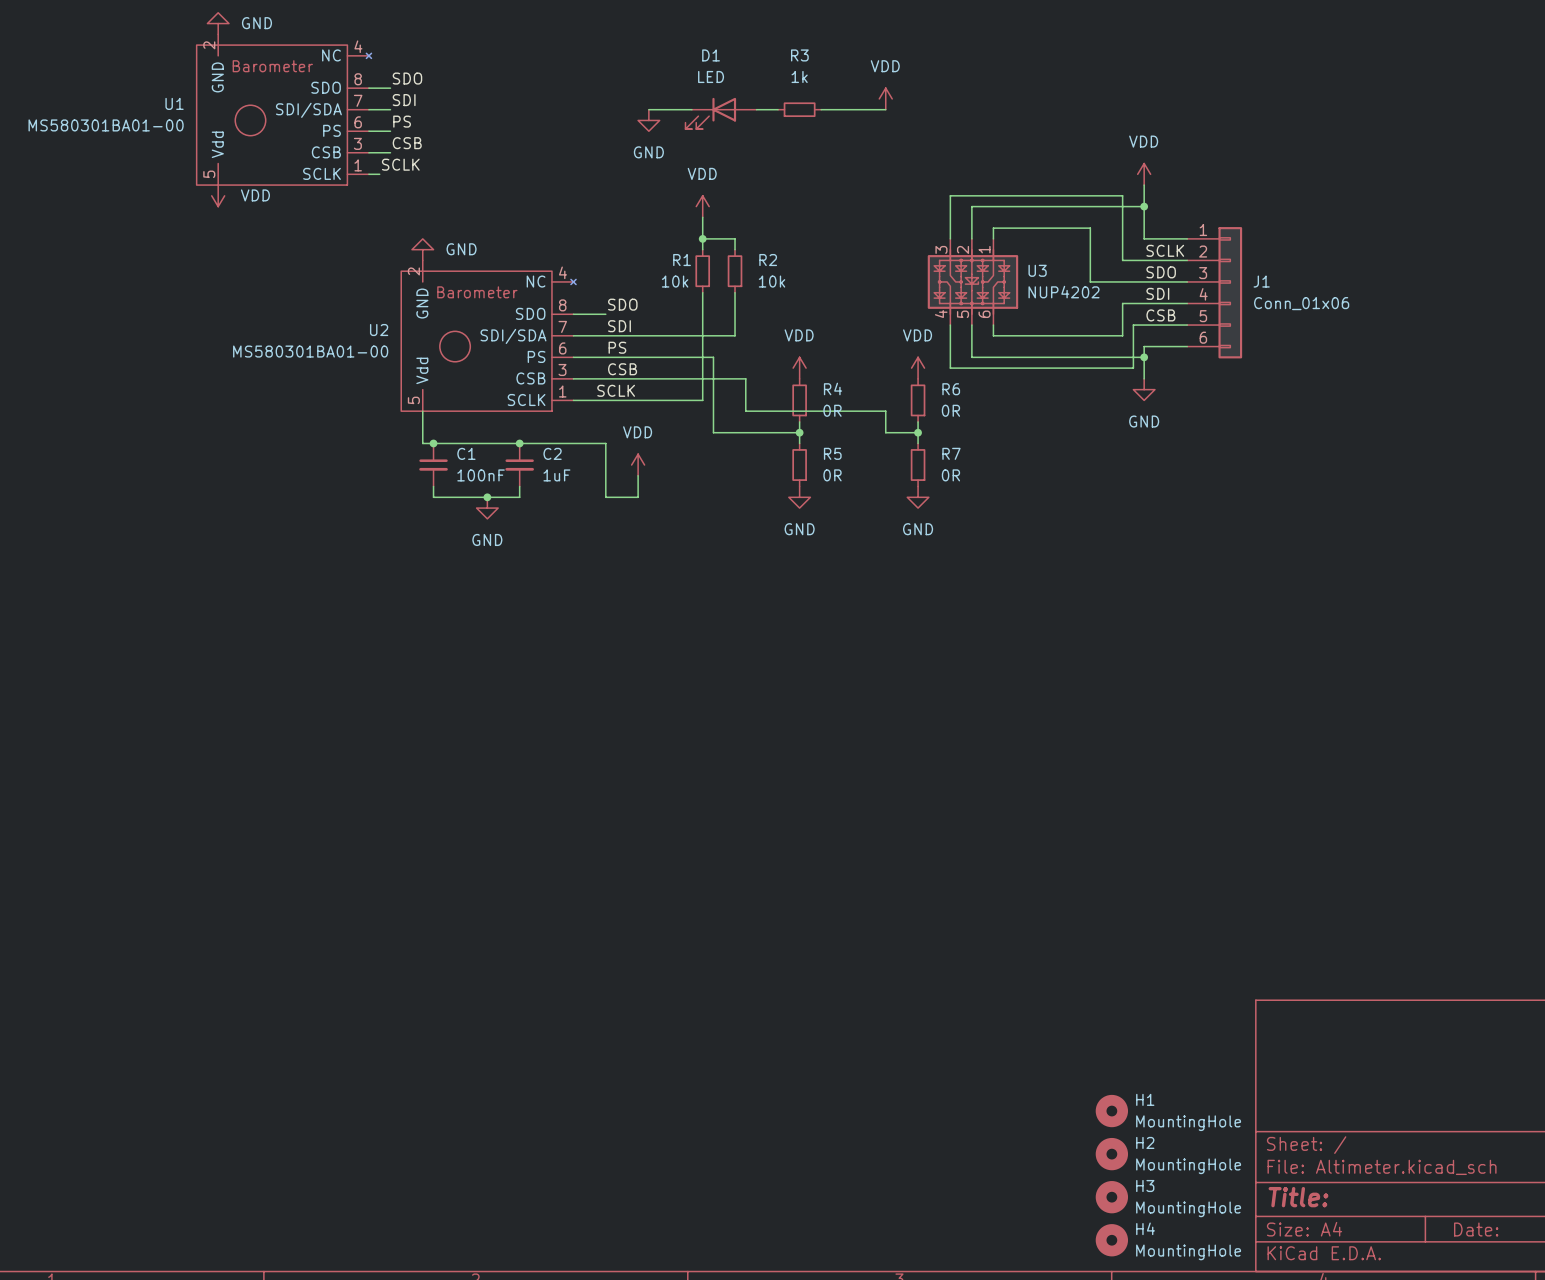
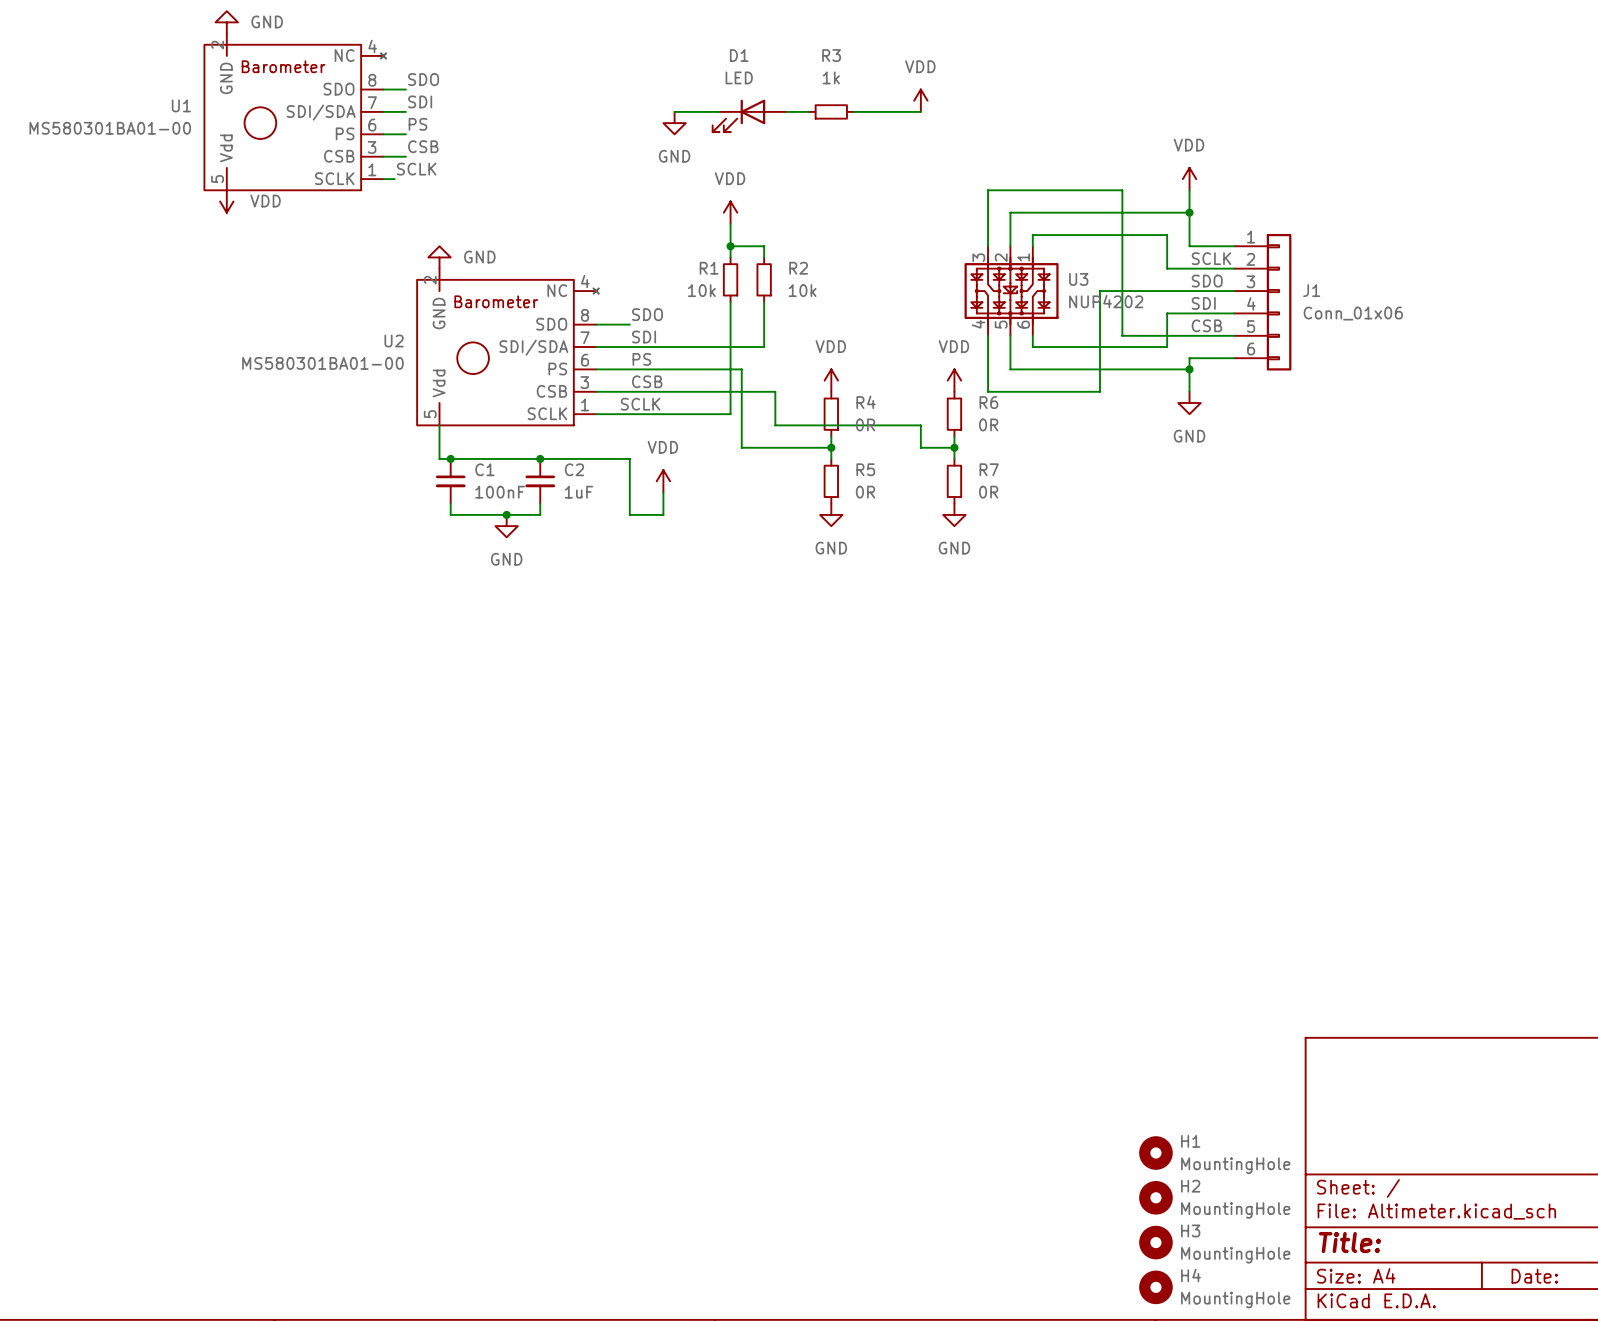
wire: (950, 195) (1122, 195) (1122, 228) -> (988, 201) (988, 190) (1122, 190) (1122, 335) (1178, 335)
wire: (1090, 228) (1090, 281) -> (1133, 235) (1167, 235)
wire: (1133, 325) (1133, 368) (950, 368) -> (1133, 291) (1099, 291) (1099, 391) (988, 391) (988, 380)

